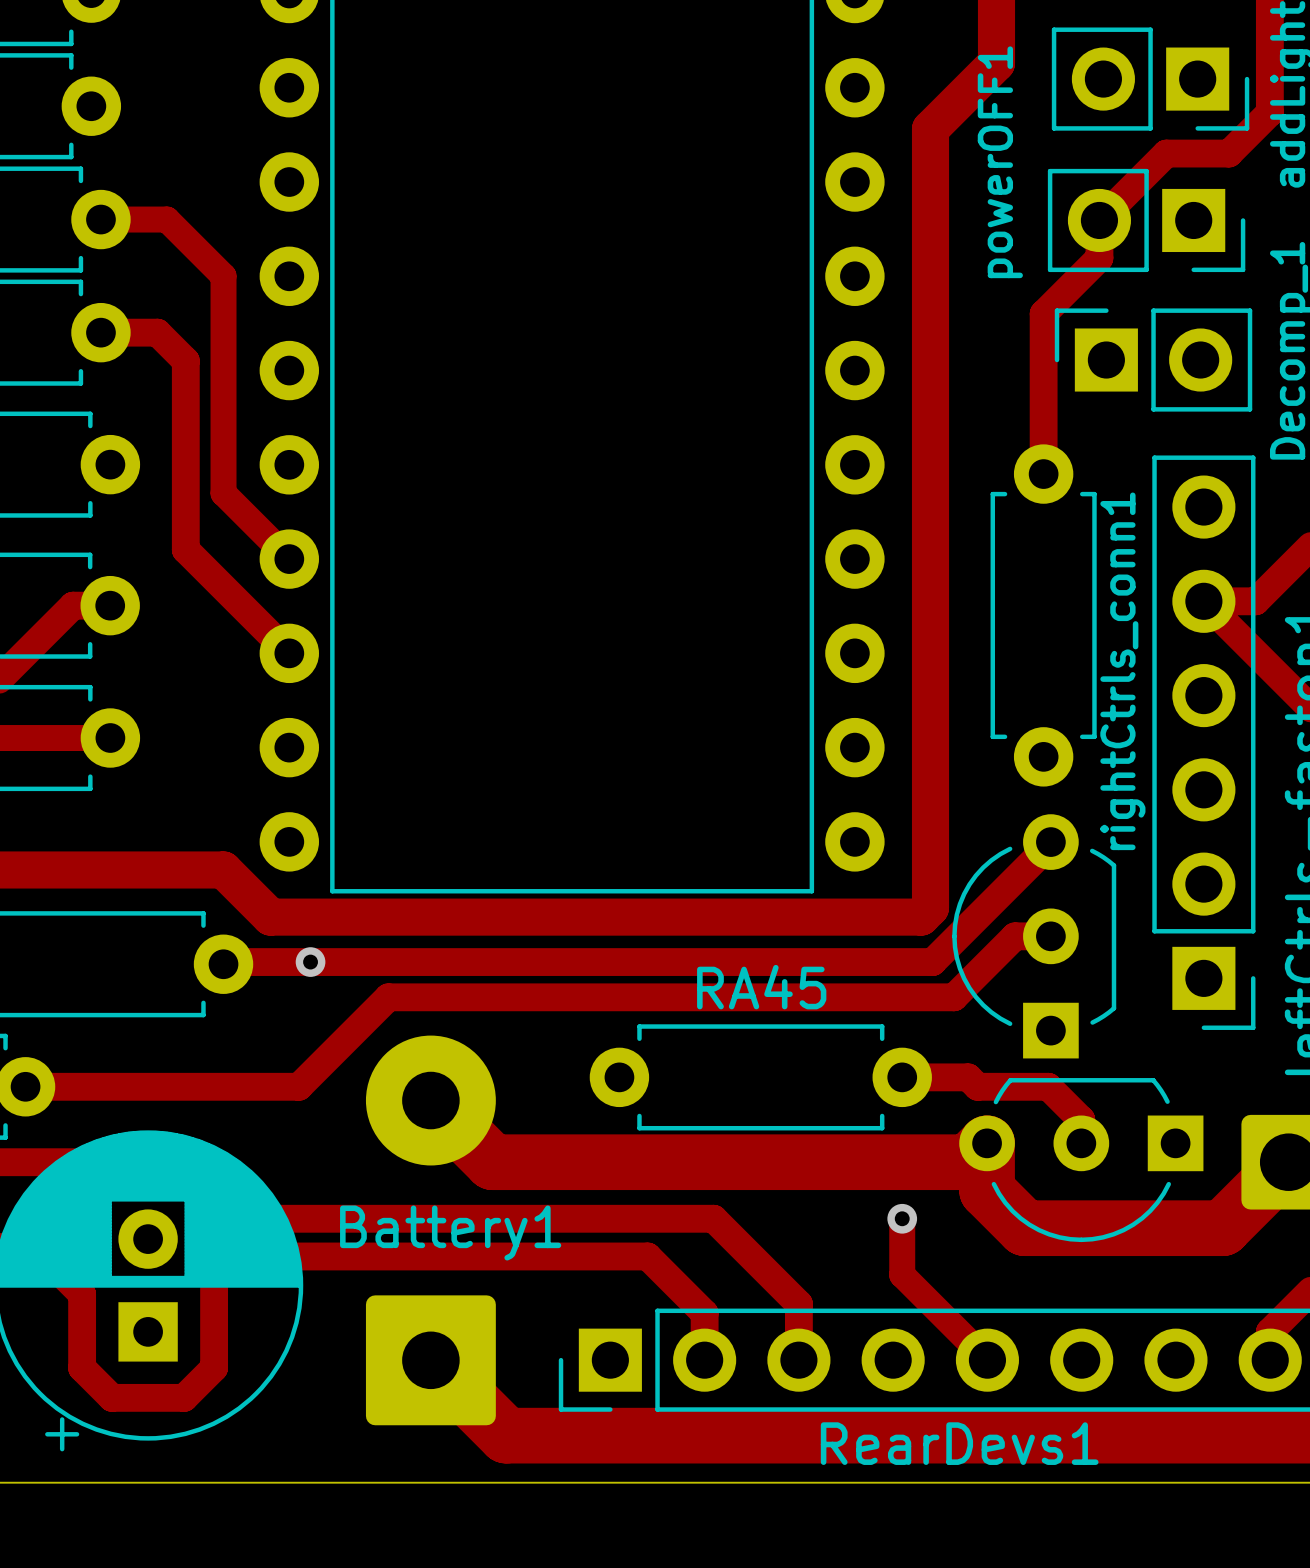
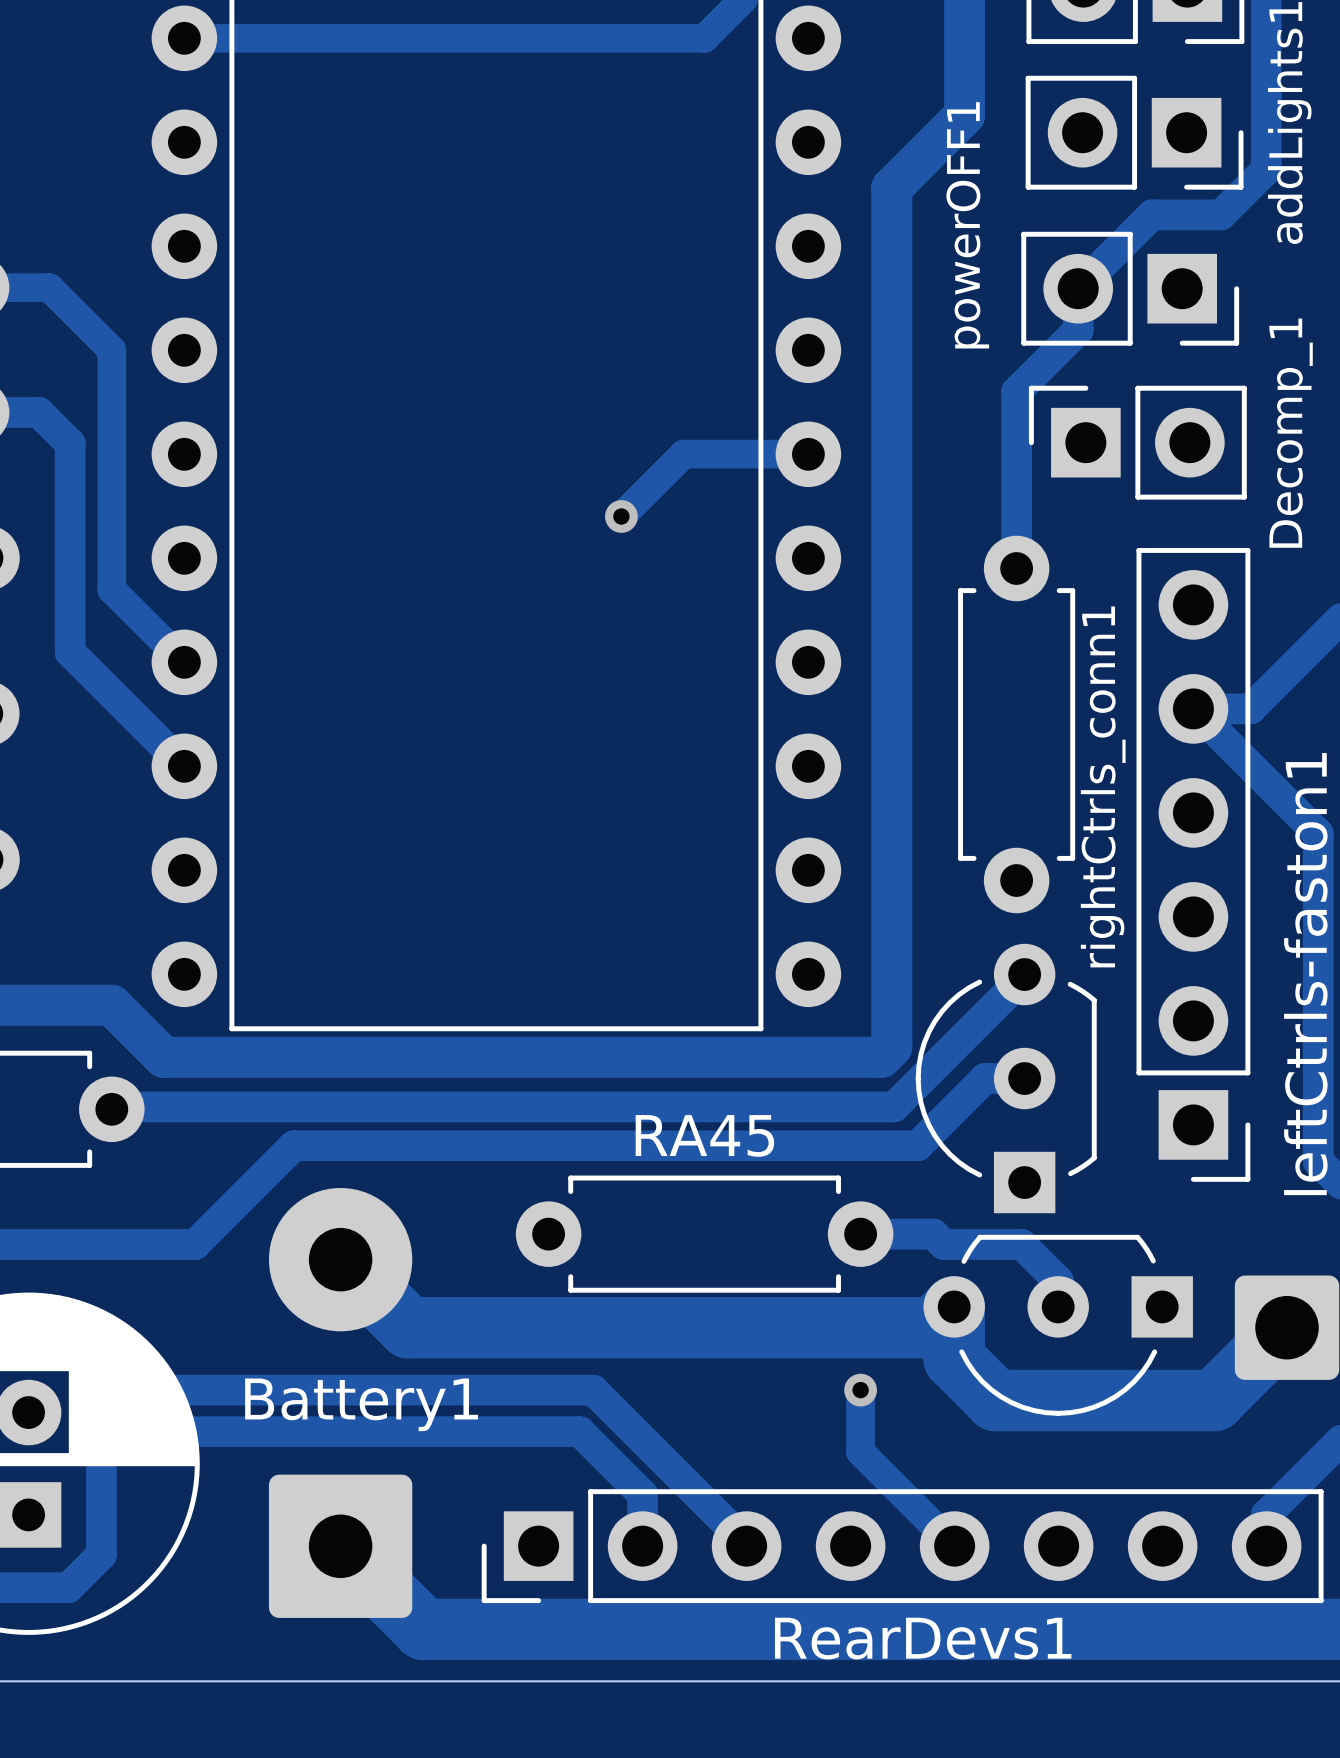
track: none -> (808, 454) (683, 454) (621, 516)
via: none -> (621, 516)
via: (310, 962) -> none
track: (659, 1218) (713, 1218) (798, 1303) (798, 1357) -> (593, 1390) (746, 1543)

